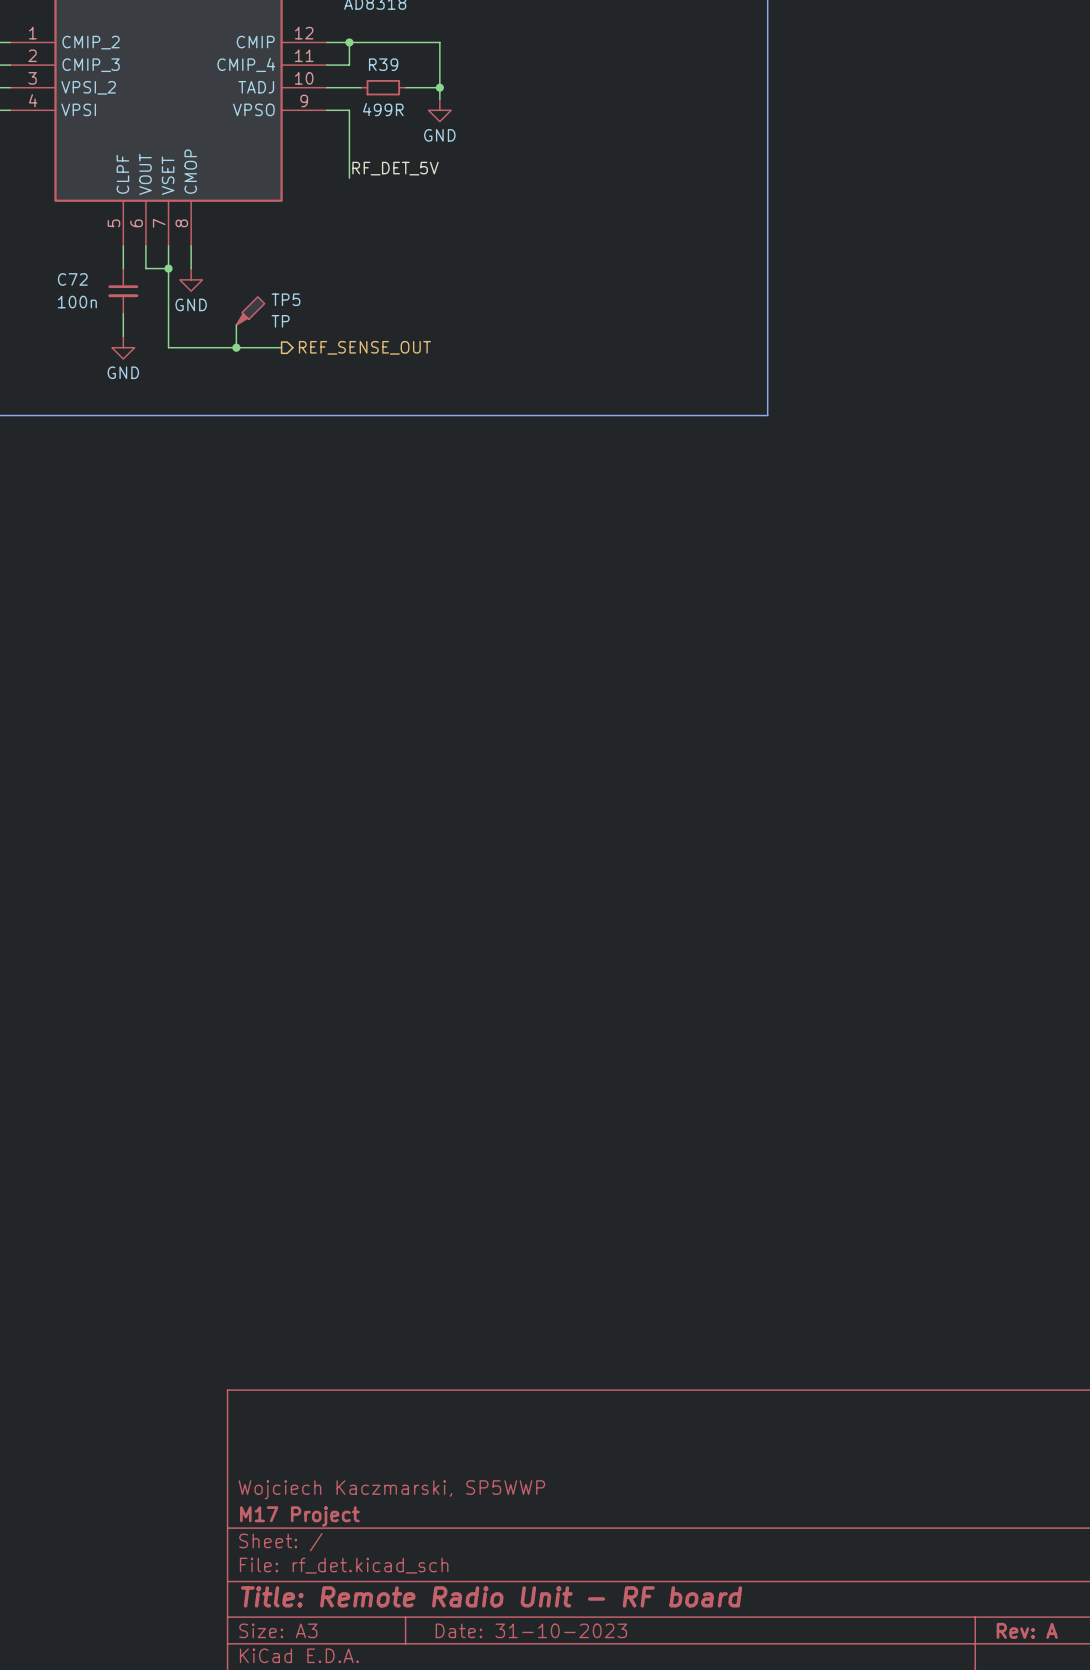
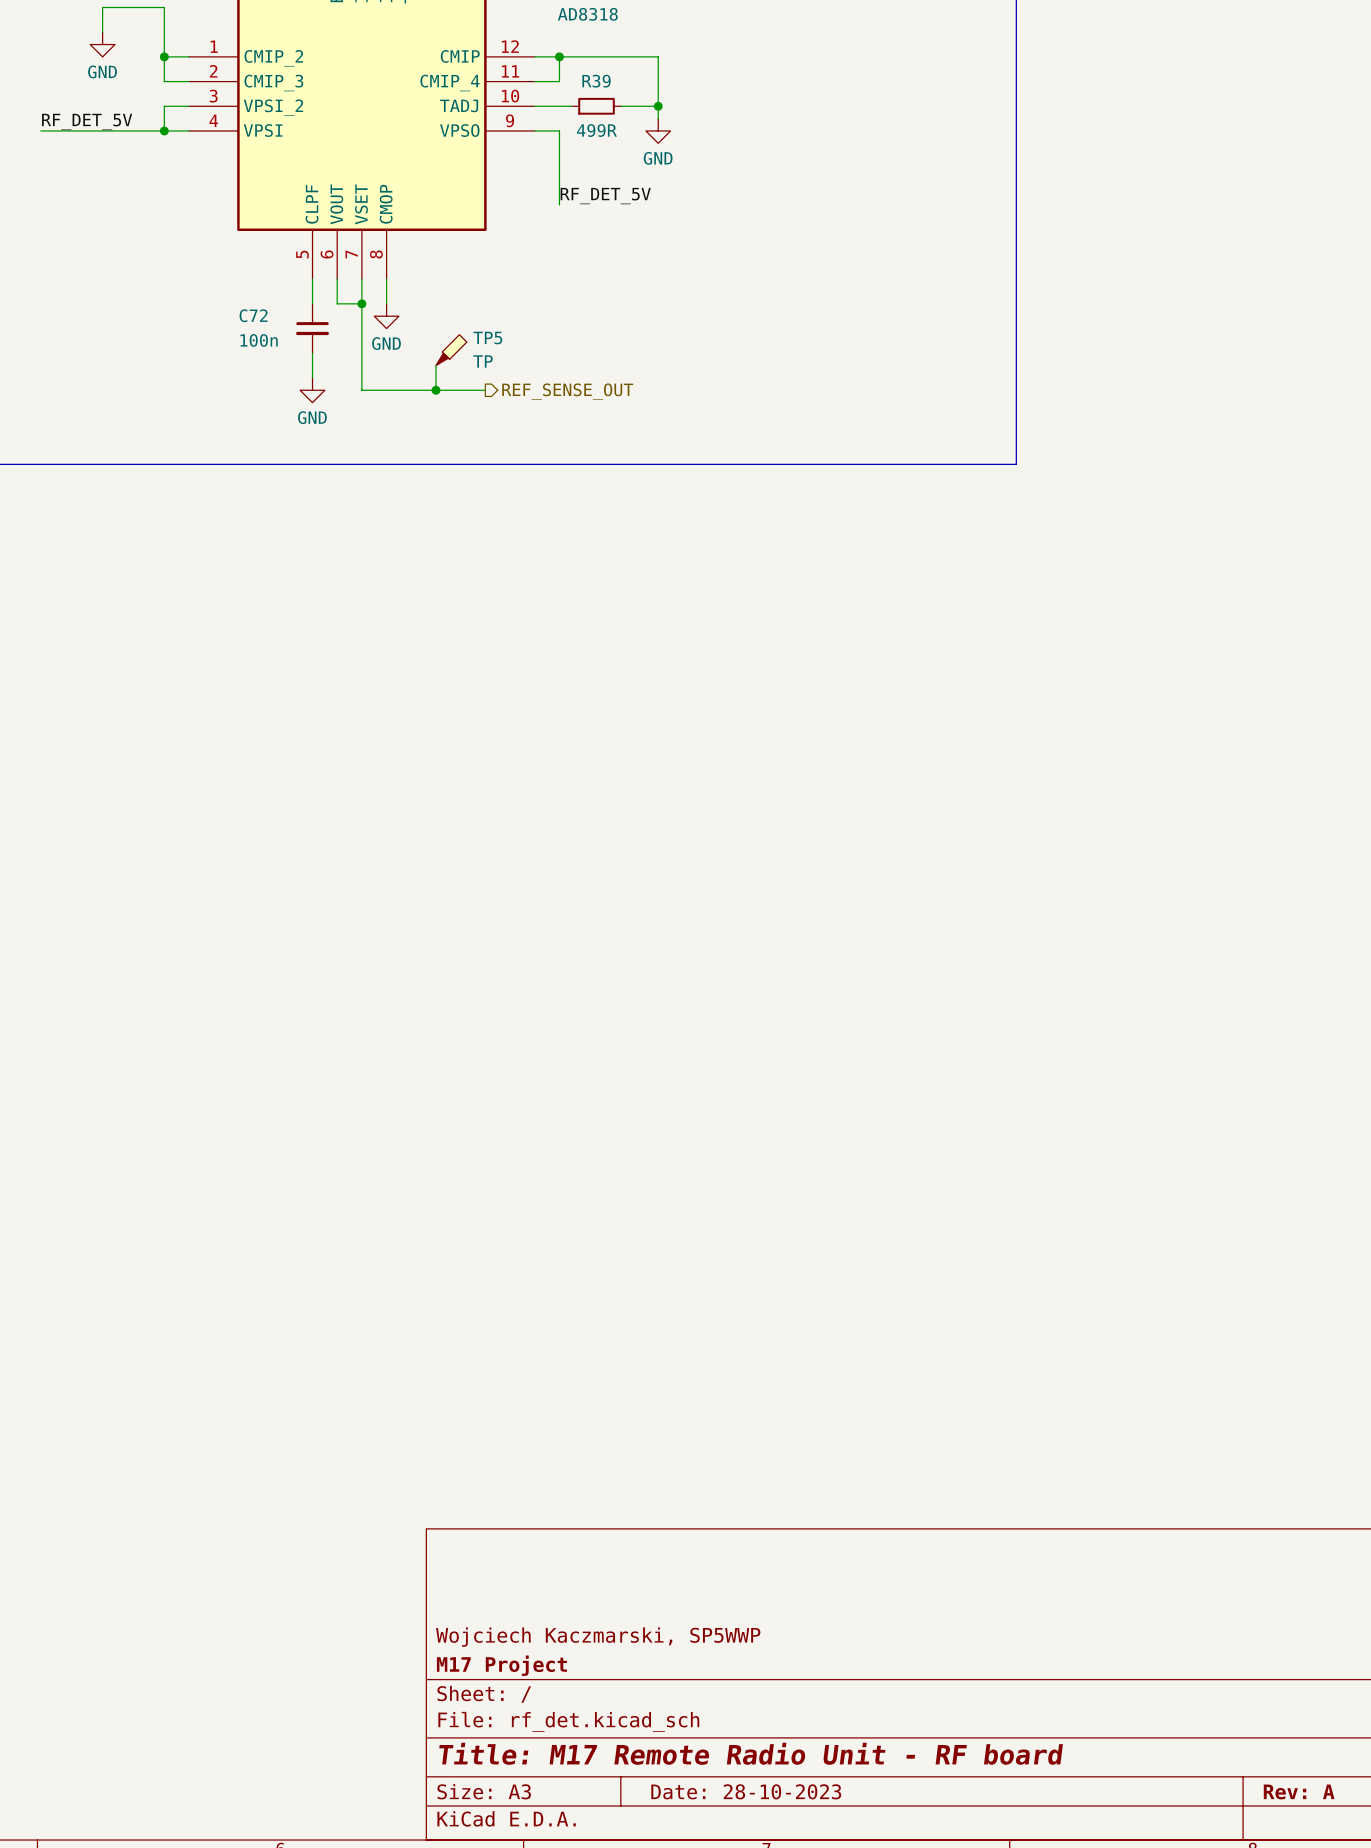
title block: Title: Remote Radio Unit - RF board (491, 1596) -> Title: M17 Remote Radio Unit - RF board (751, 1753)
title block: Date: 31-10-2023 (531, 1630) -> Date: 28-10-2023 (746, 1791)

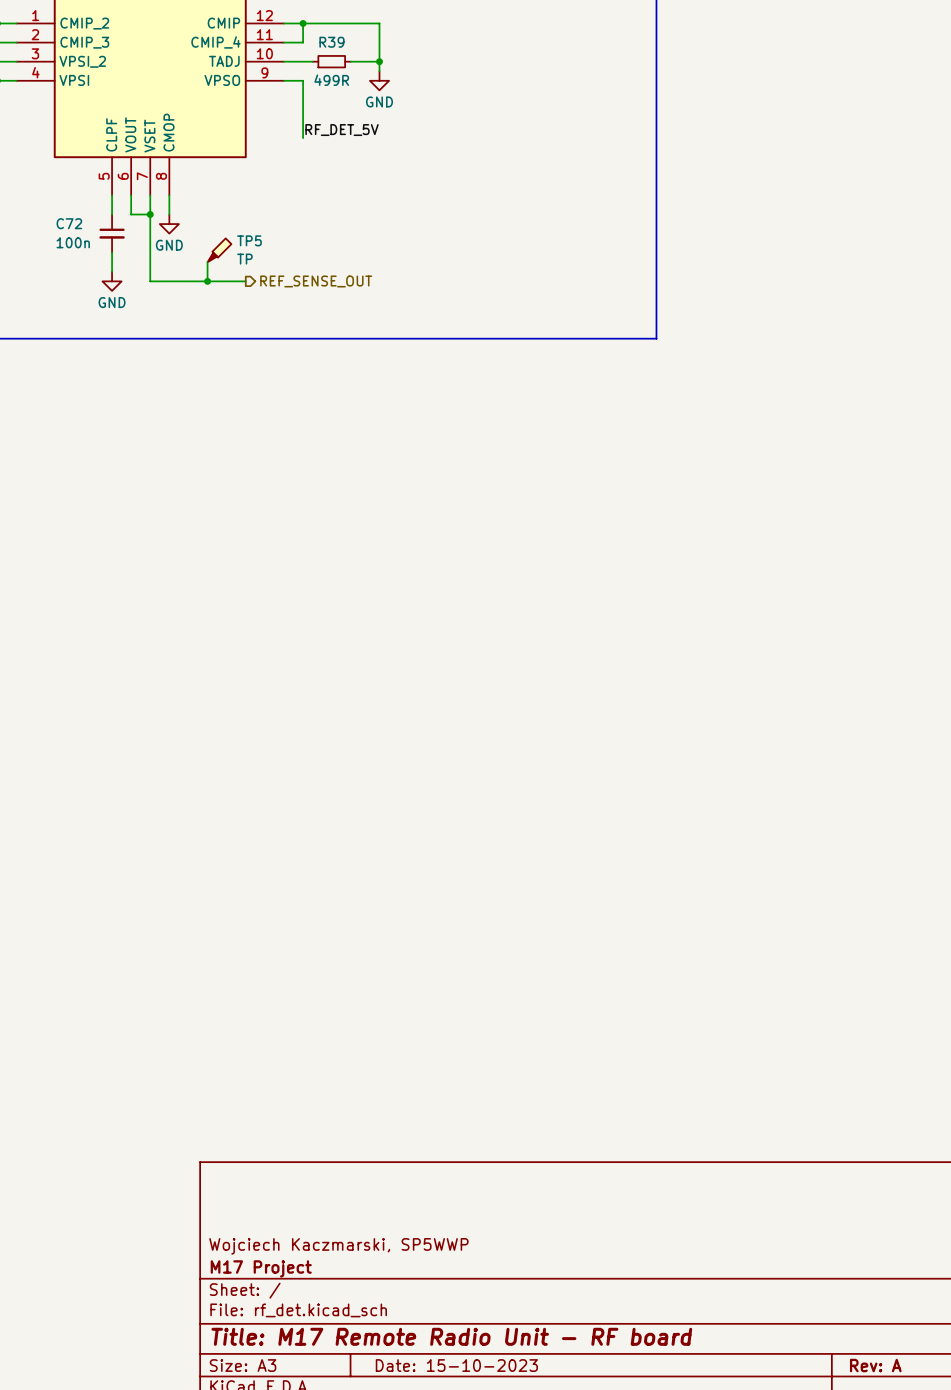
title block: Date: 28-10-2023 (746, 1791) -> Date: 15-10-2023 (456, 1365)

